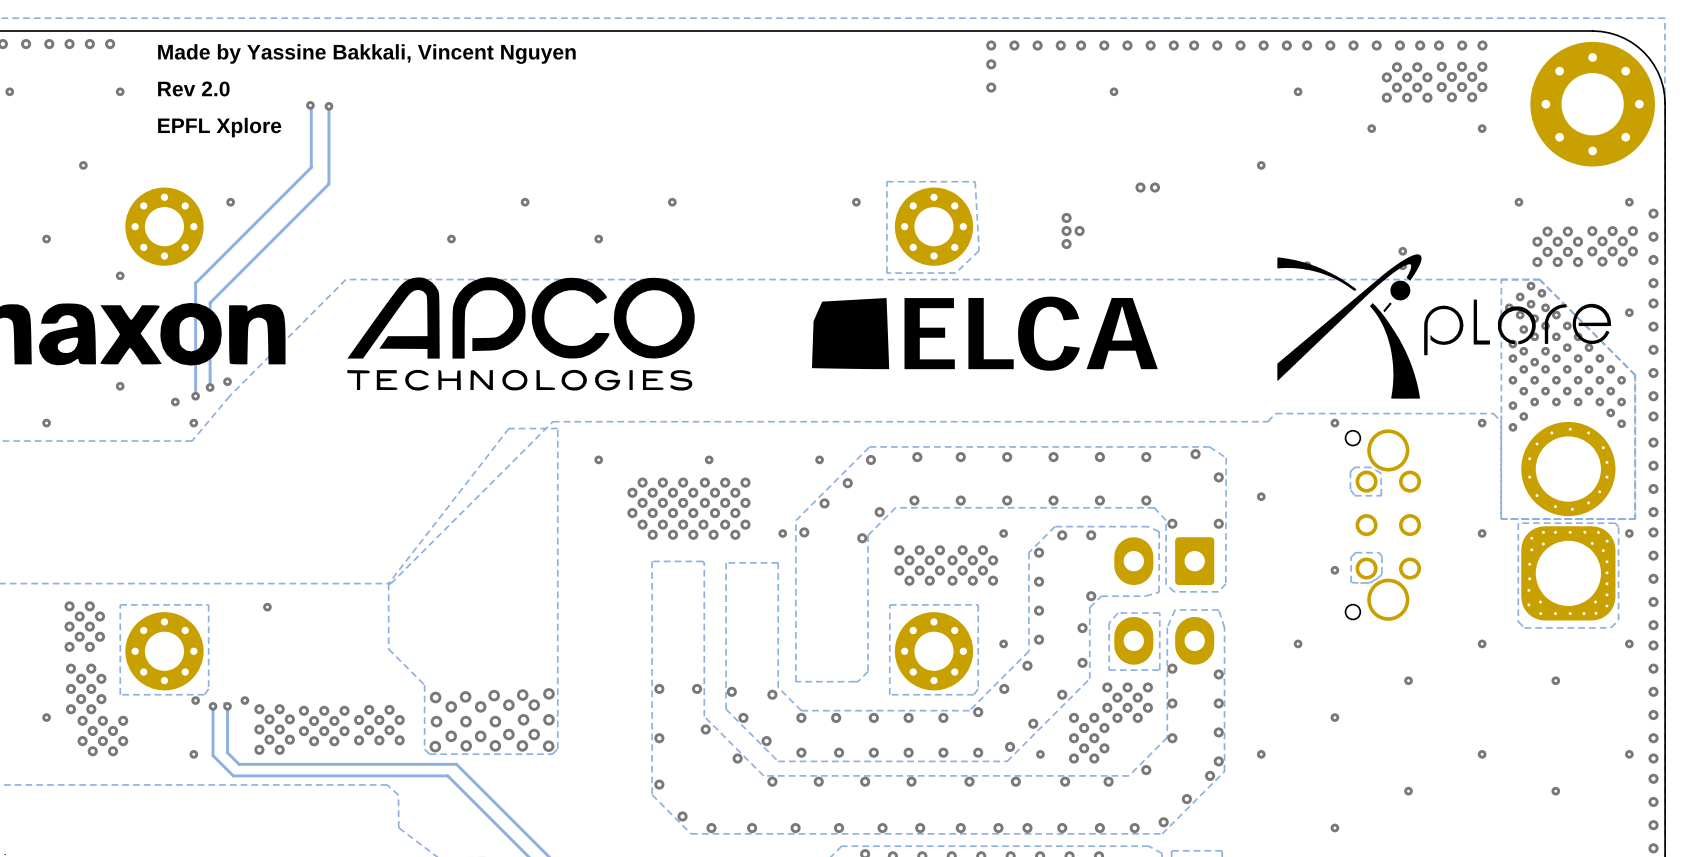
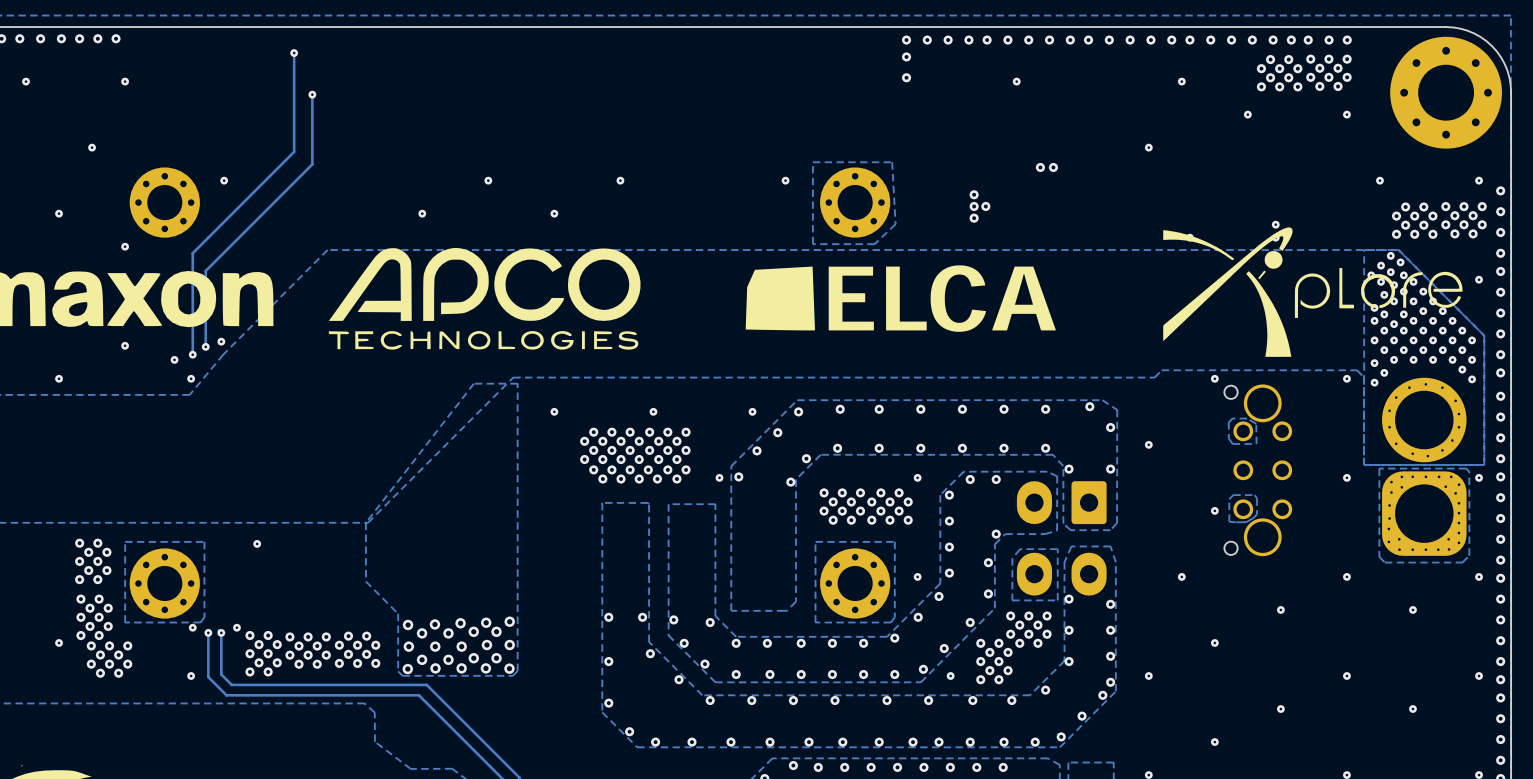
text: Made by Yassine Bakkali, Vincent Nguyen (366, 54) -> none
text: Rev 2.0 (193, 88) -> none
track: (310, 105) (311, 167) (308, 170) -> (294, 53) (294, 151)
via position: (310, 105) -> (294, 53)
text: EPFL Xplore (219, 127) -> none

